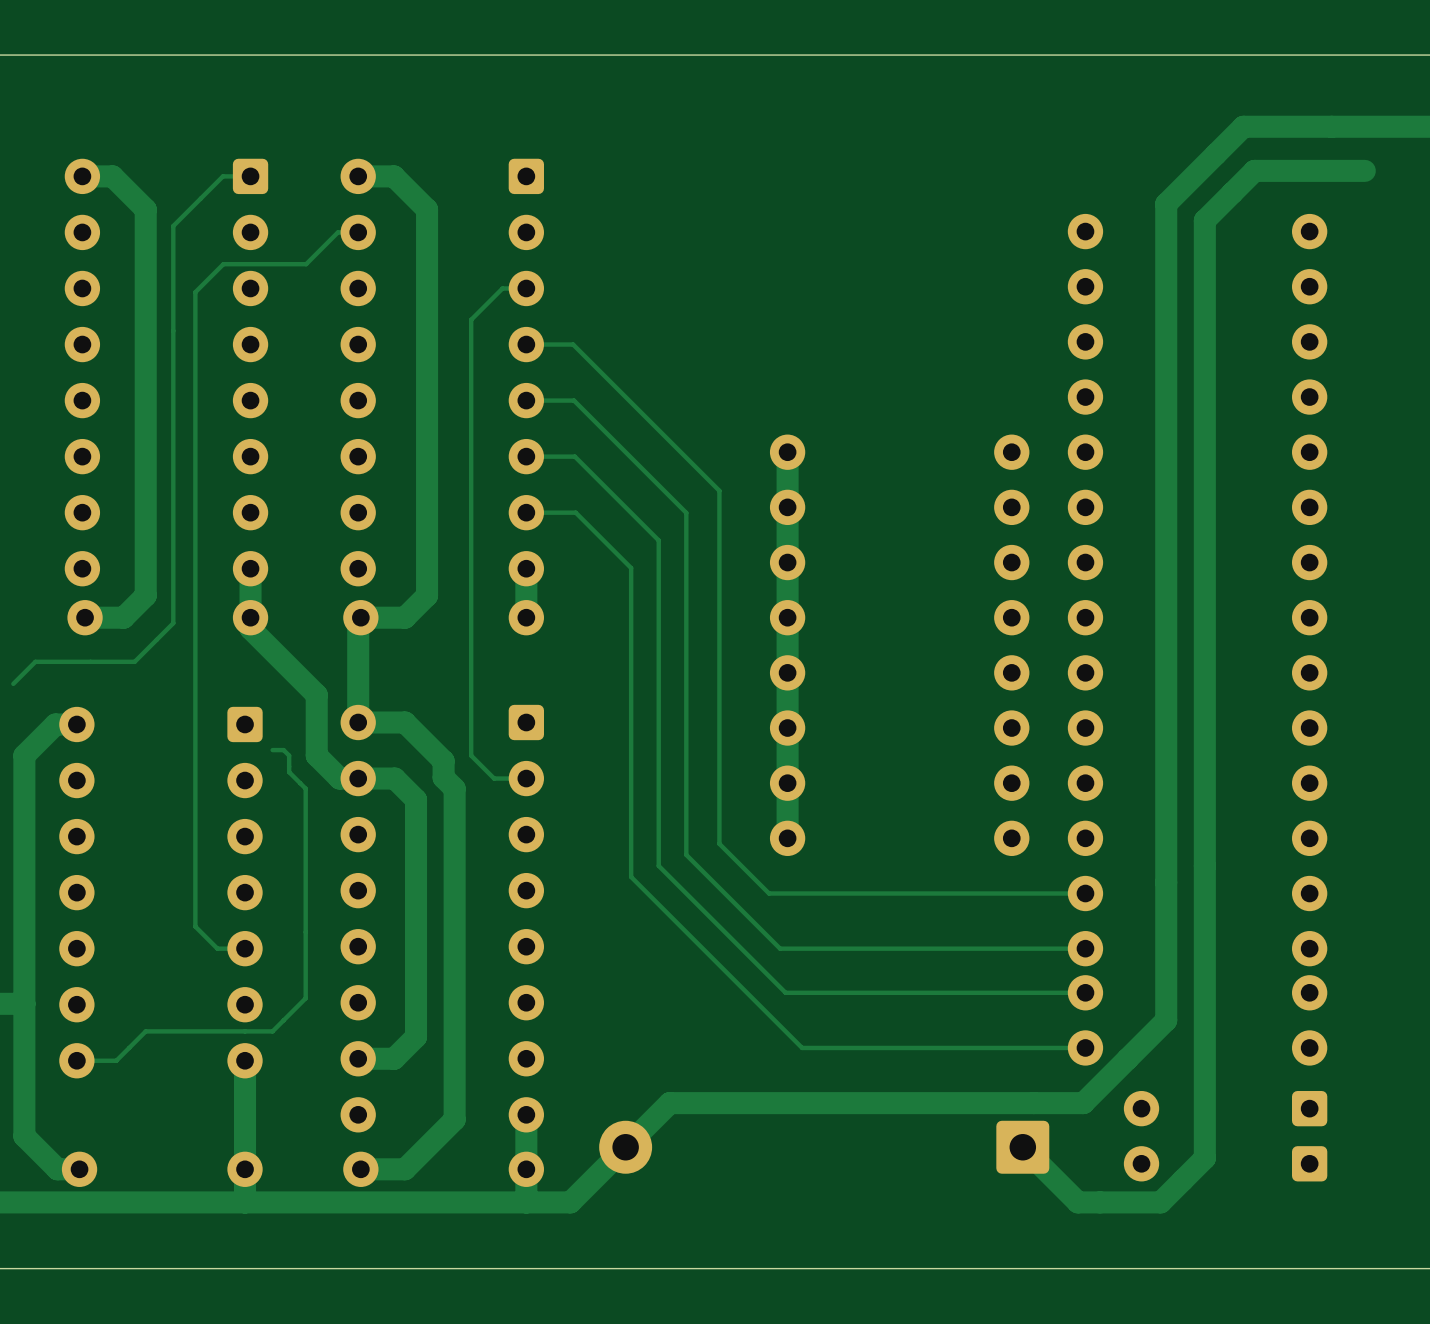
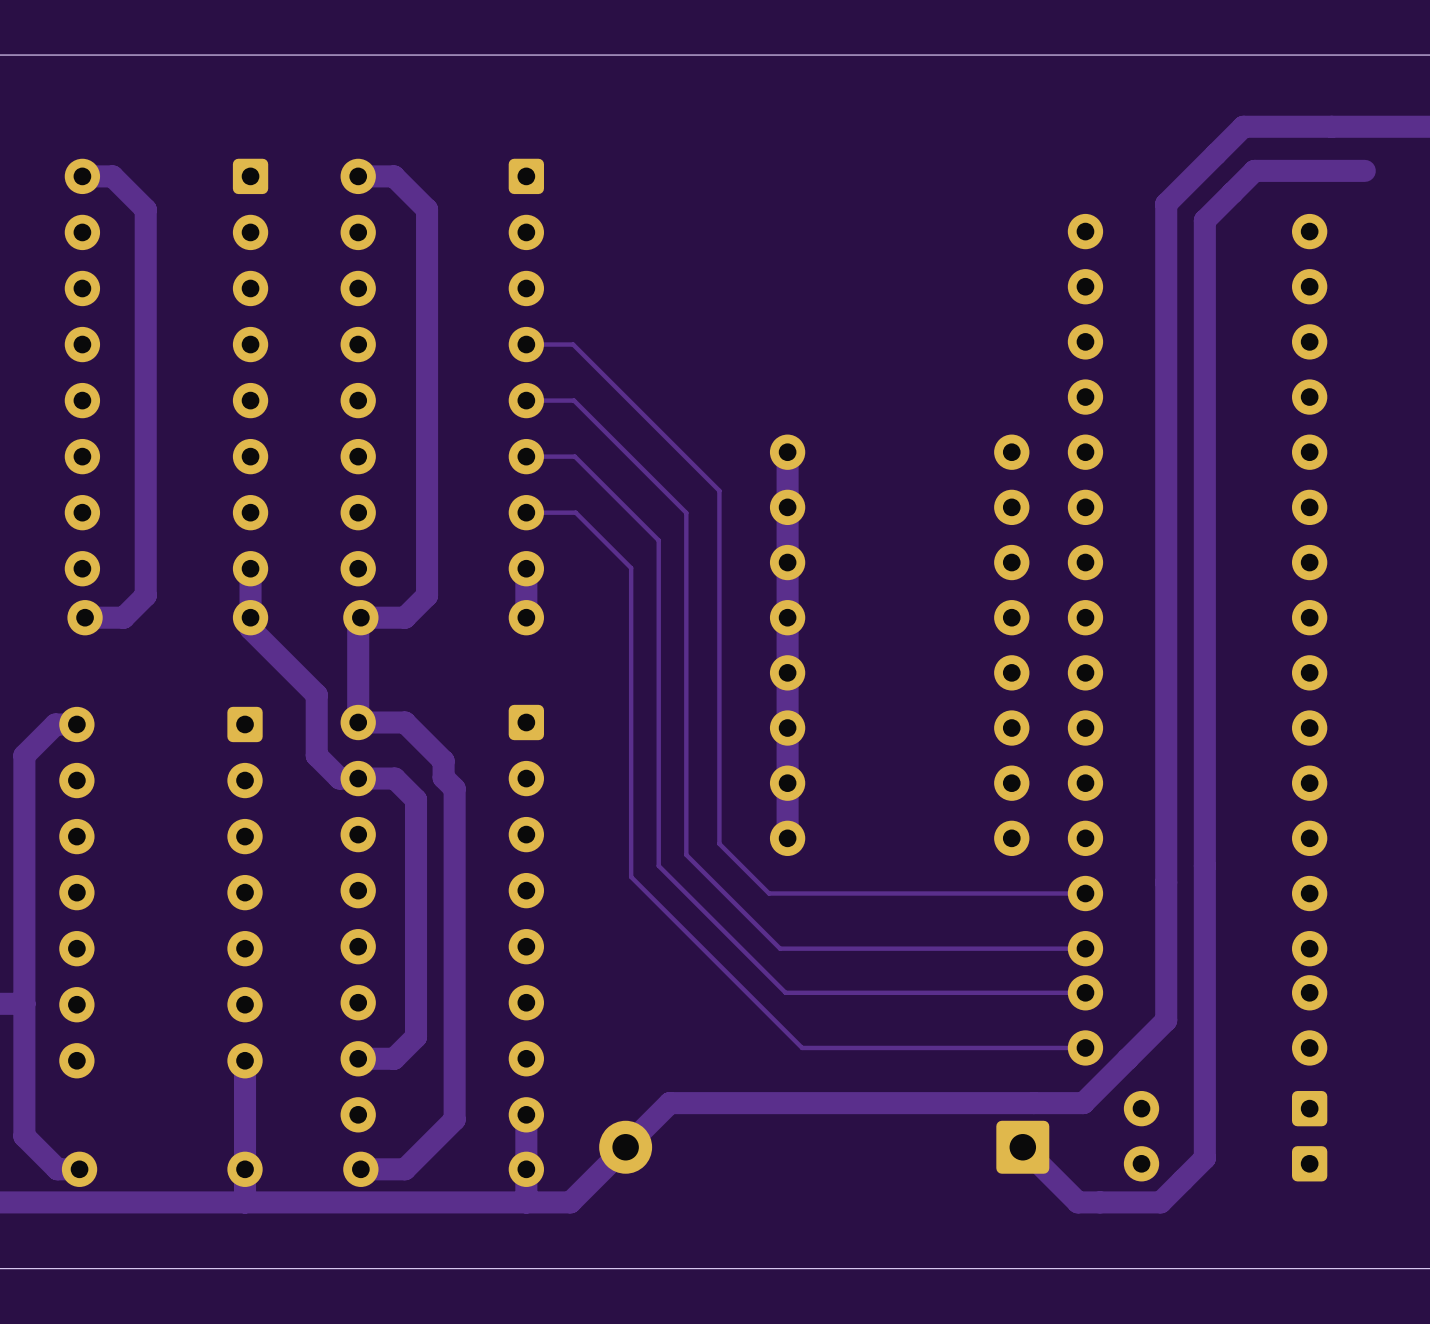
track: (250, 176) (222, 176) (173, 226) (173, 623) (134, 661) (35, 661) (13, 683) -> none
track: (358, 232) (337, 232) (306, 264) (223, 264) (195, 292) (195, 926) (217, 948) (245, 948) -> none
track: (526, 288) (502, 288) (471, 319) (471, 755) (494, 778) (526, 778) -> none
track: (272, 750) (283, 750) (289, 755) (289, 772) (305, 788) (305, 998) (272, 1031) (145, 1031) (116, 1060) (76, 1060) -> none

